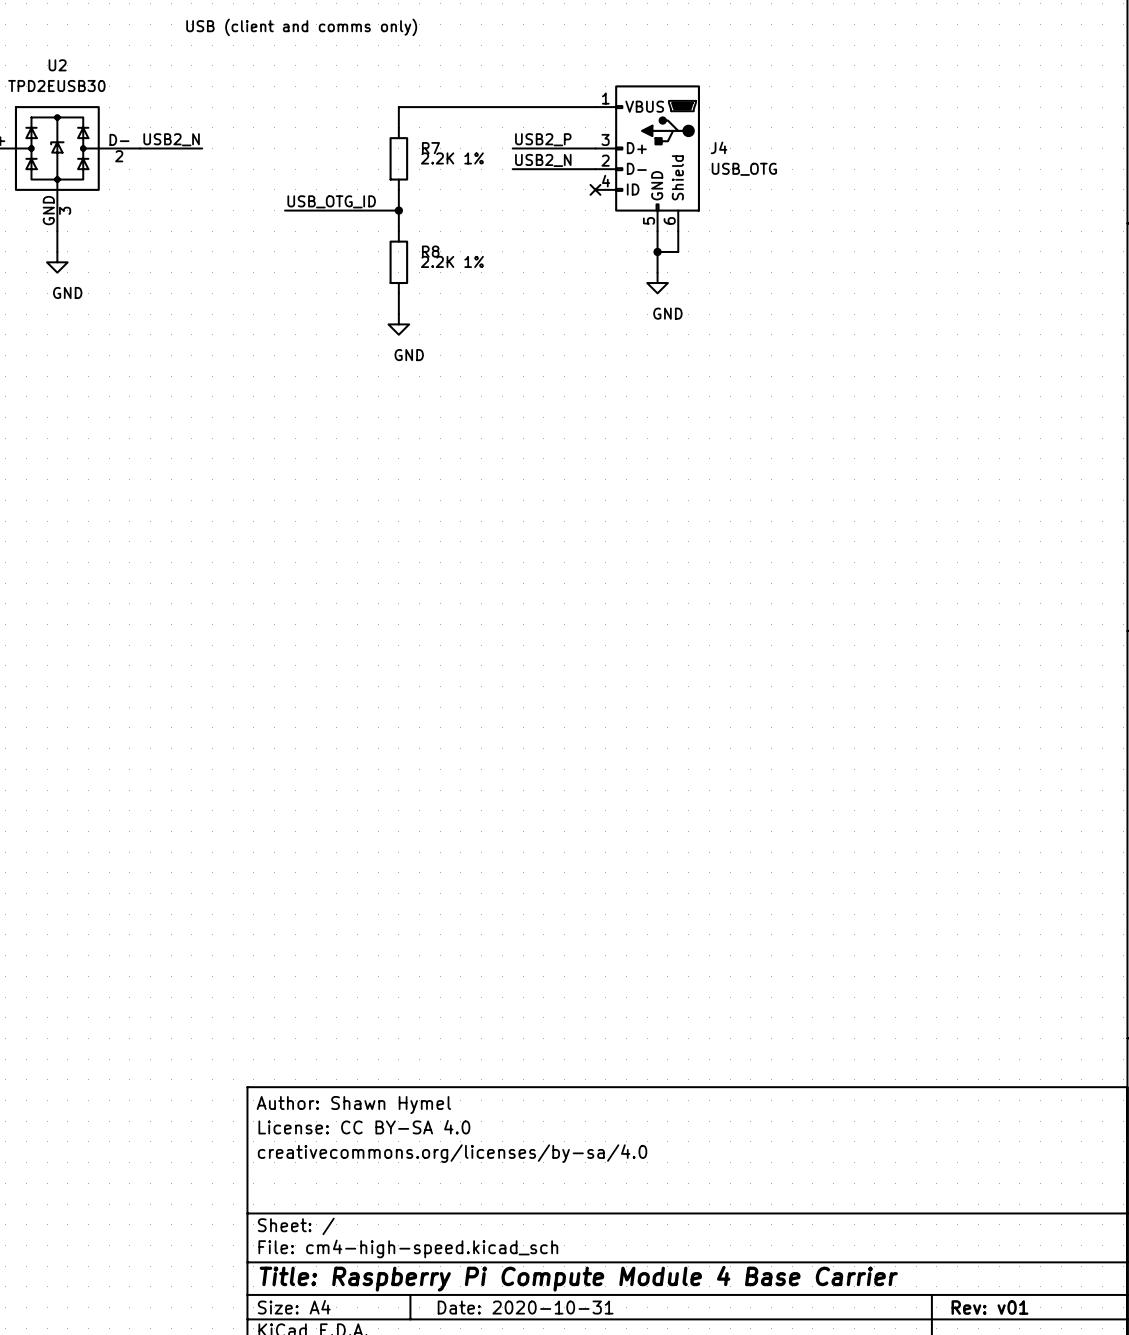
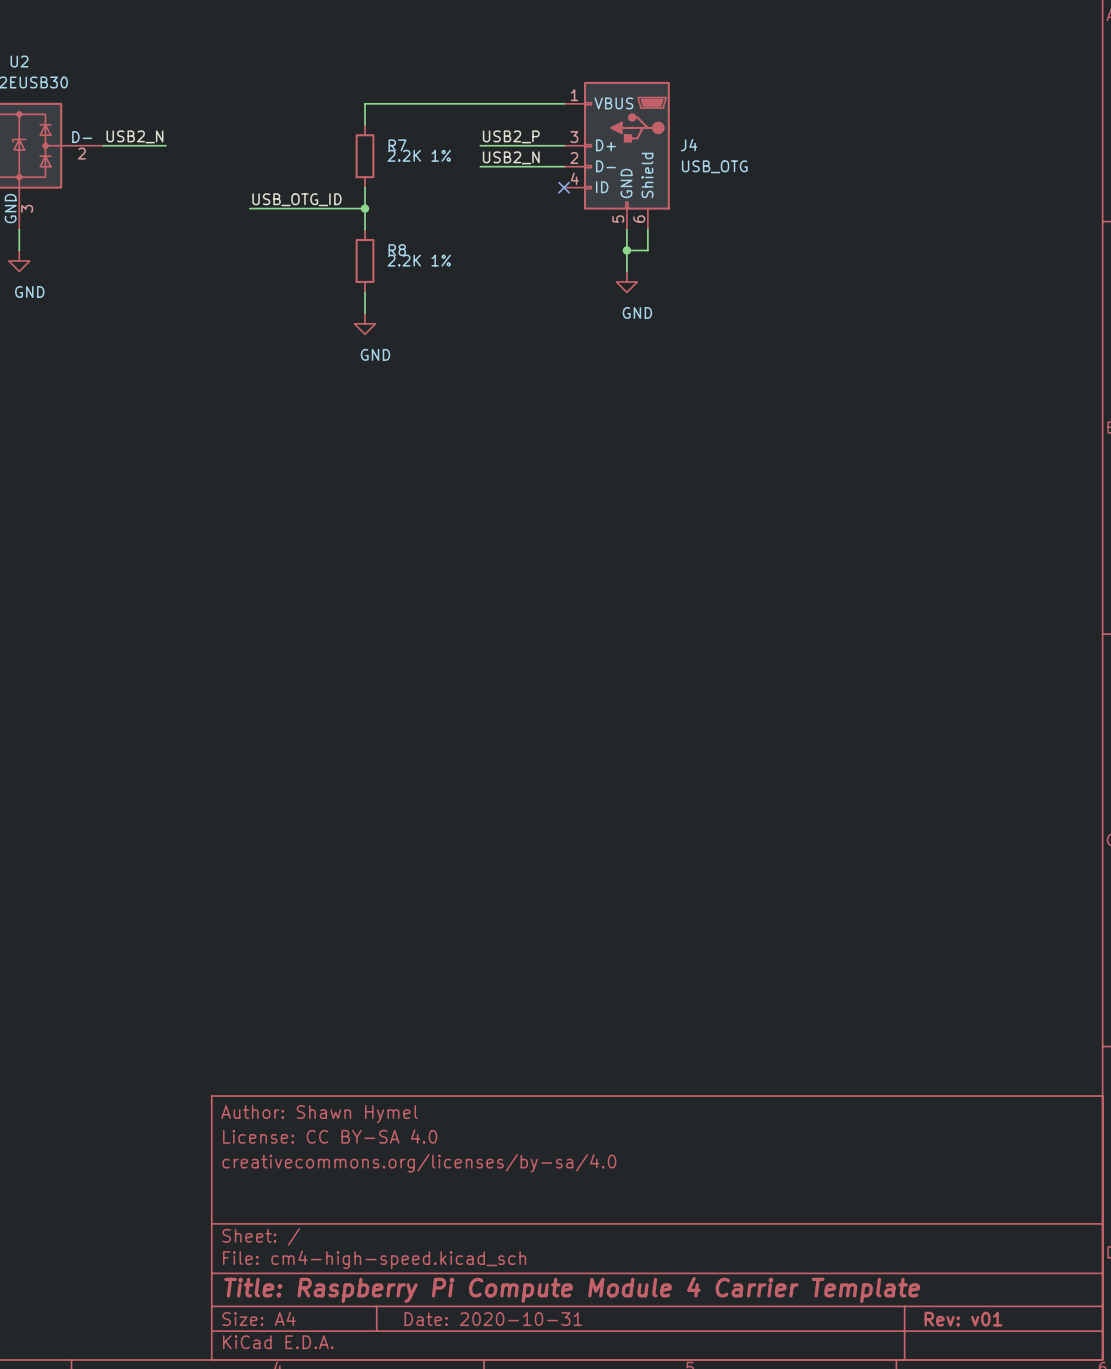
text: USB (client and comms only) (301, 27) -> none
title block: Title: Raspberry Pi Compute Module 4 Base Carrier (578, 1278) -> Title: Raspberry Pi Compute Module 4 Carrier Template (572, 1289)

